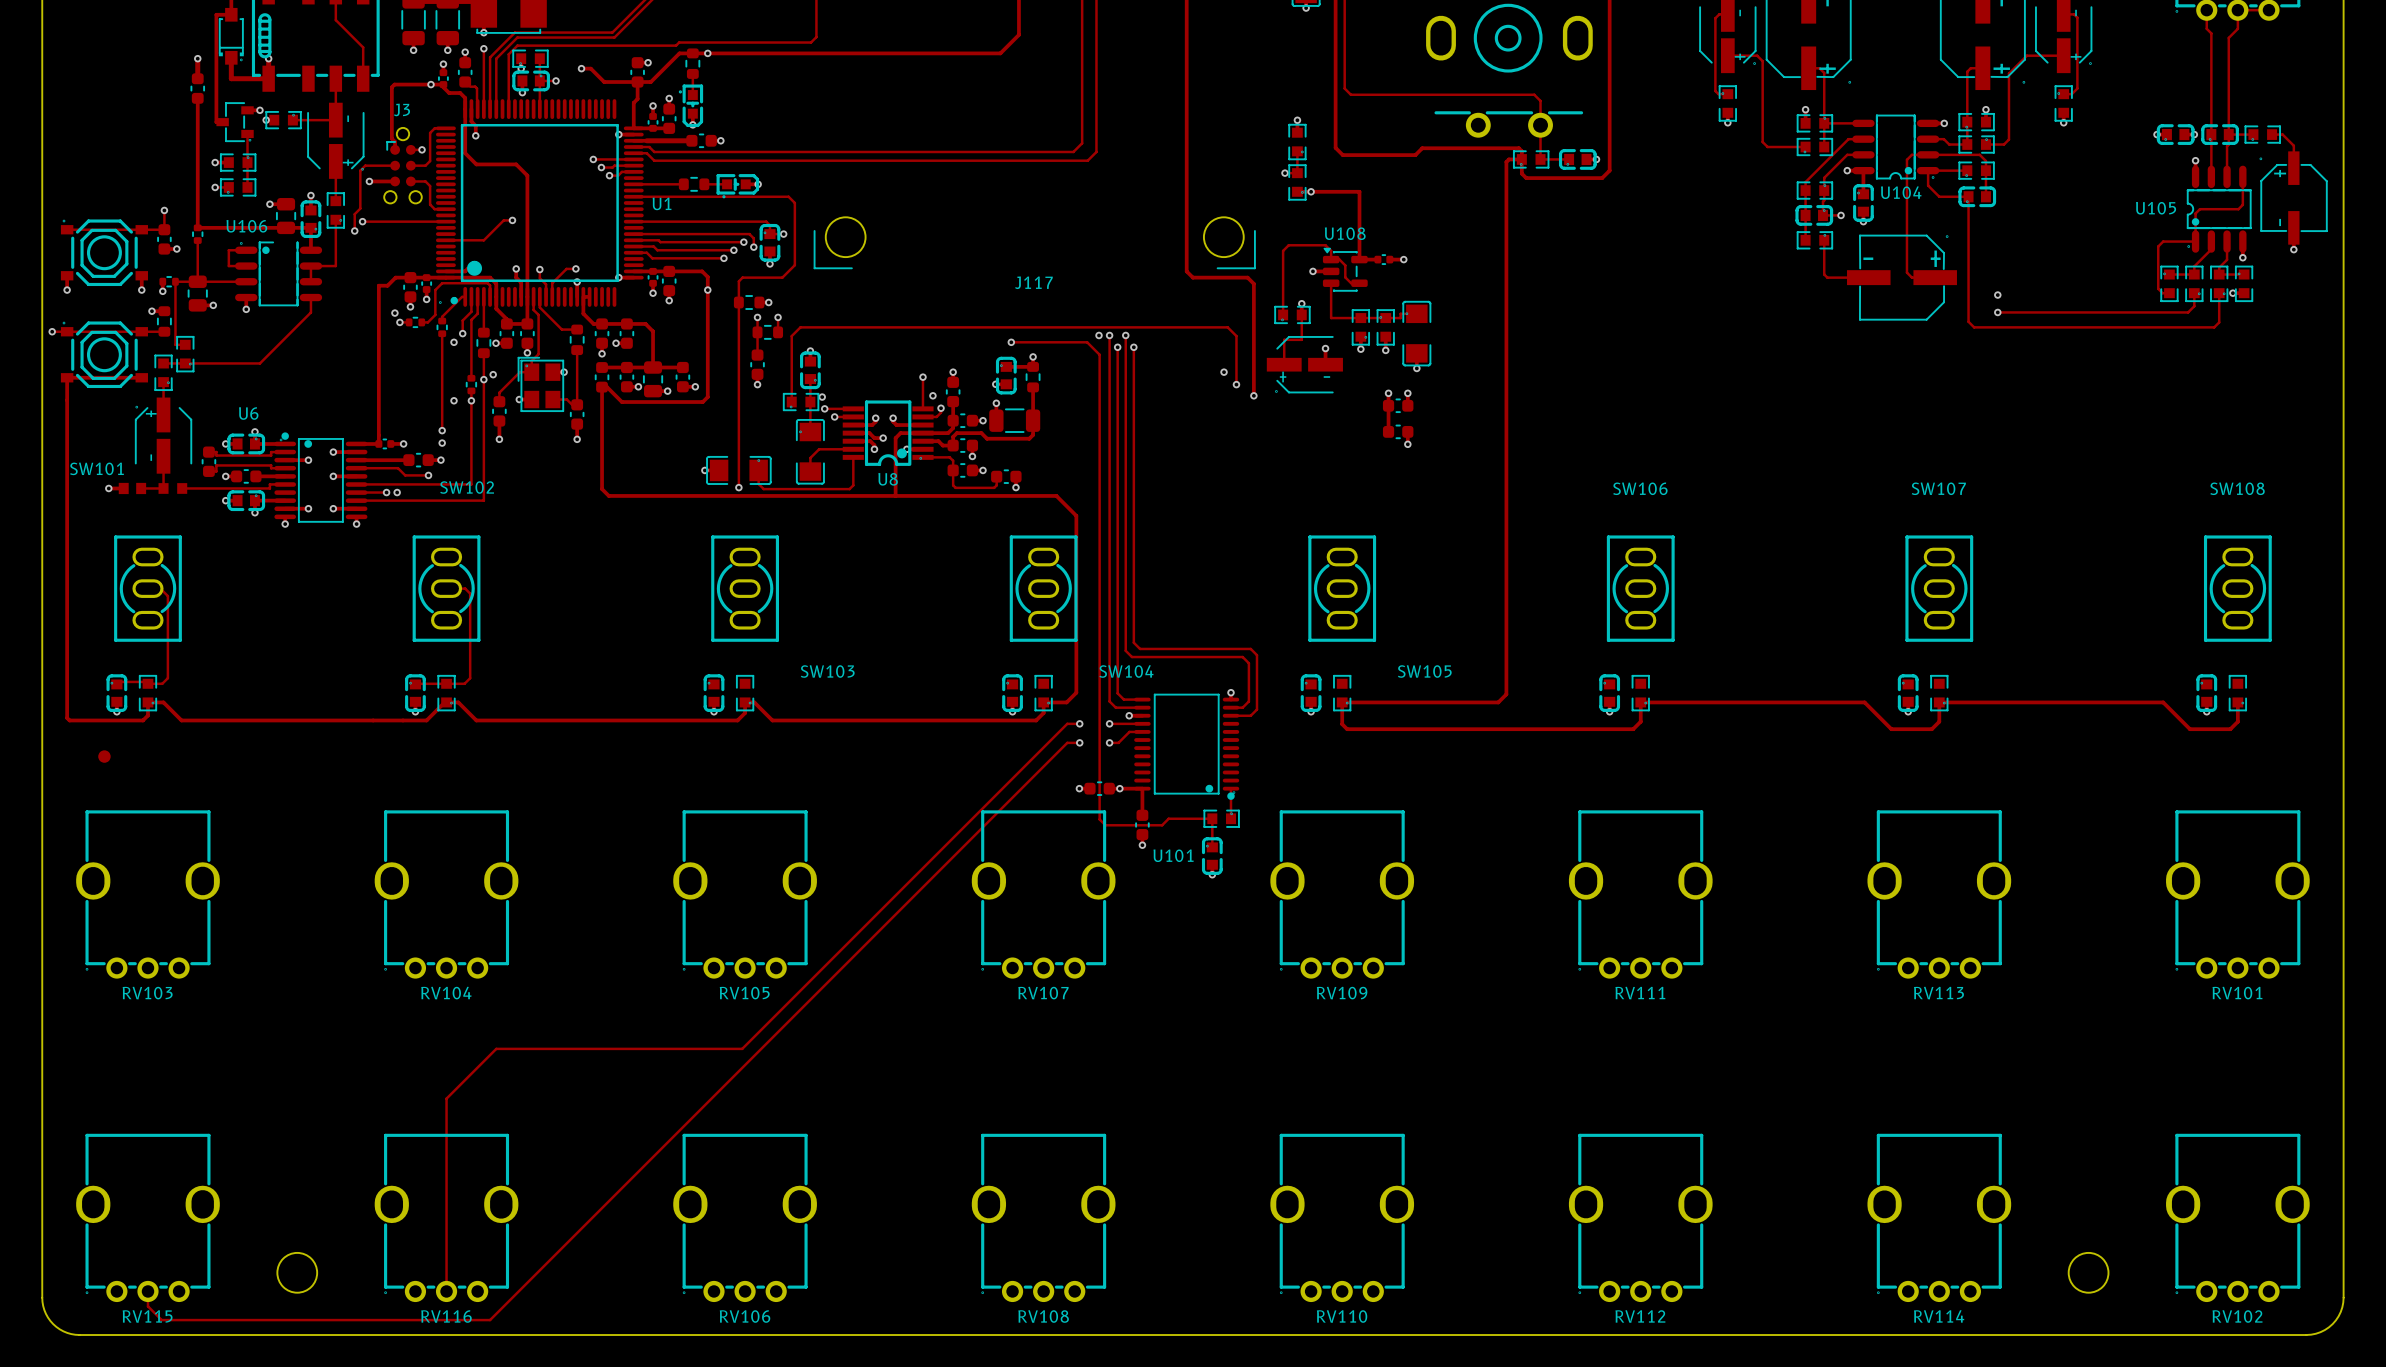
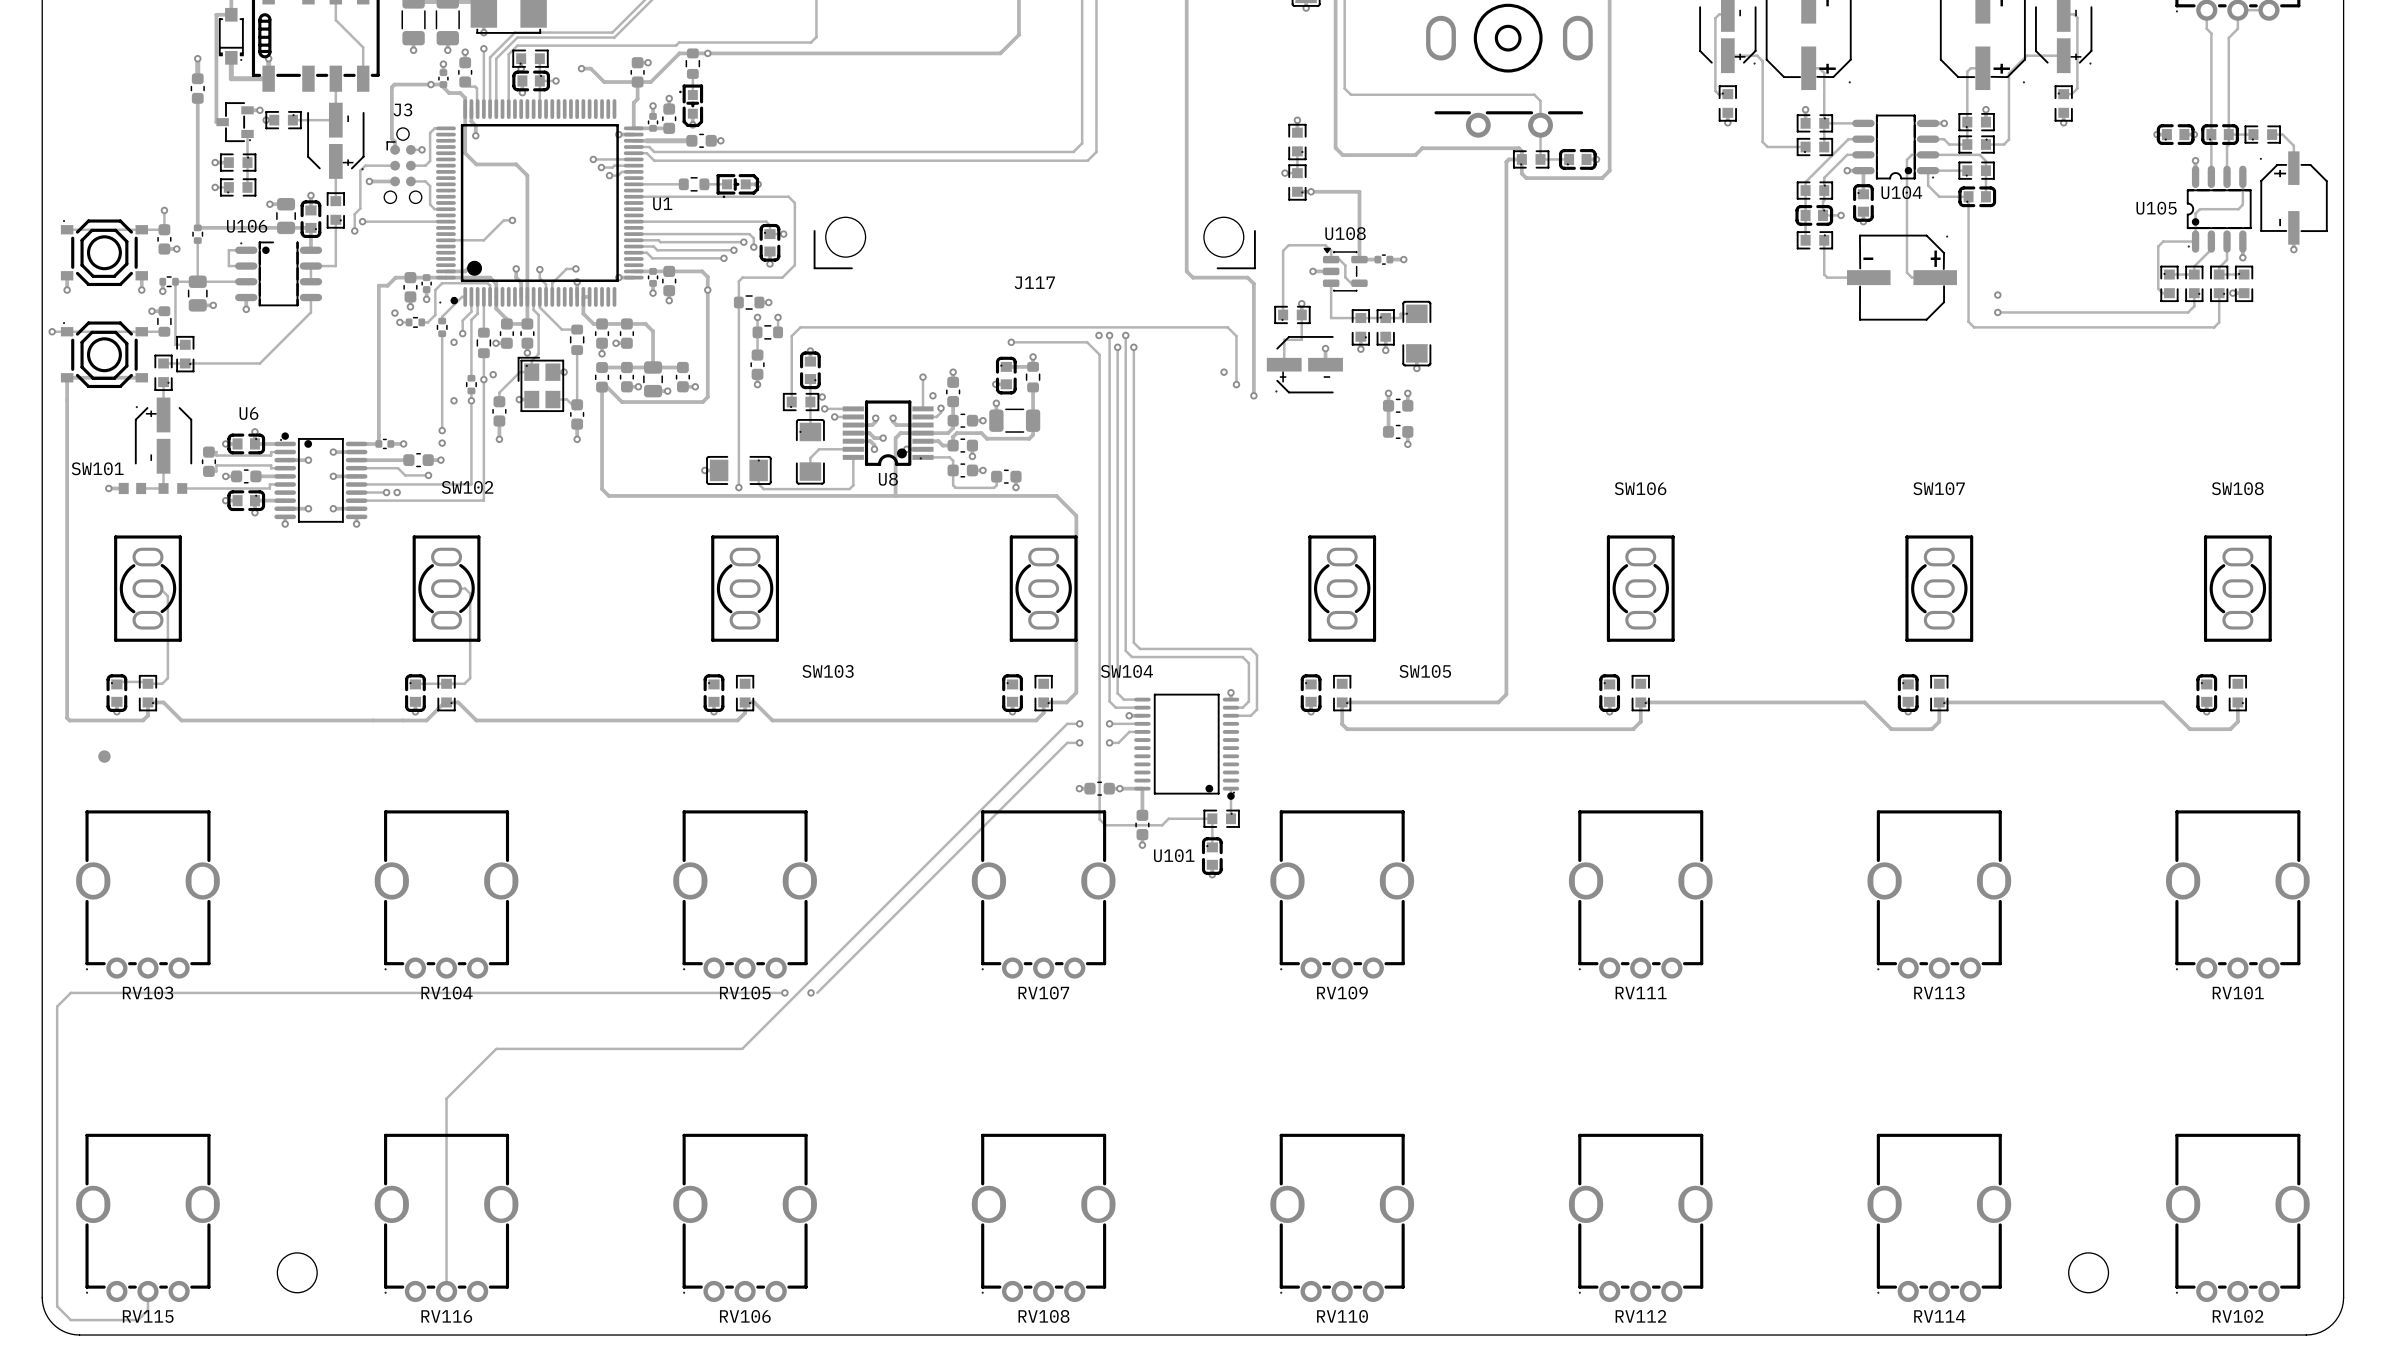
via: none -> (784, 992)
via: none -> (811, 992)
track: (817, 992) (490, 1320) (161, 1320) (147, 1306) -> (784, 992) (70, 992) (57, 1006) (57, 1306) (70, 1320) (138, 1320) (147, 1310) (147, 1306)

